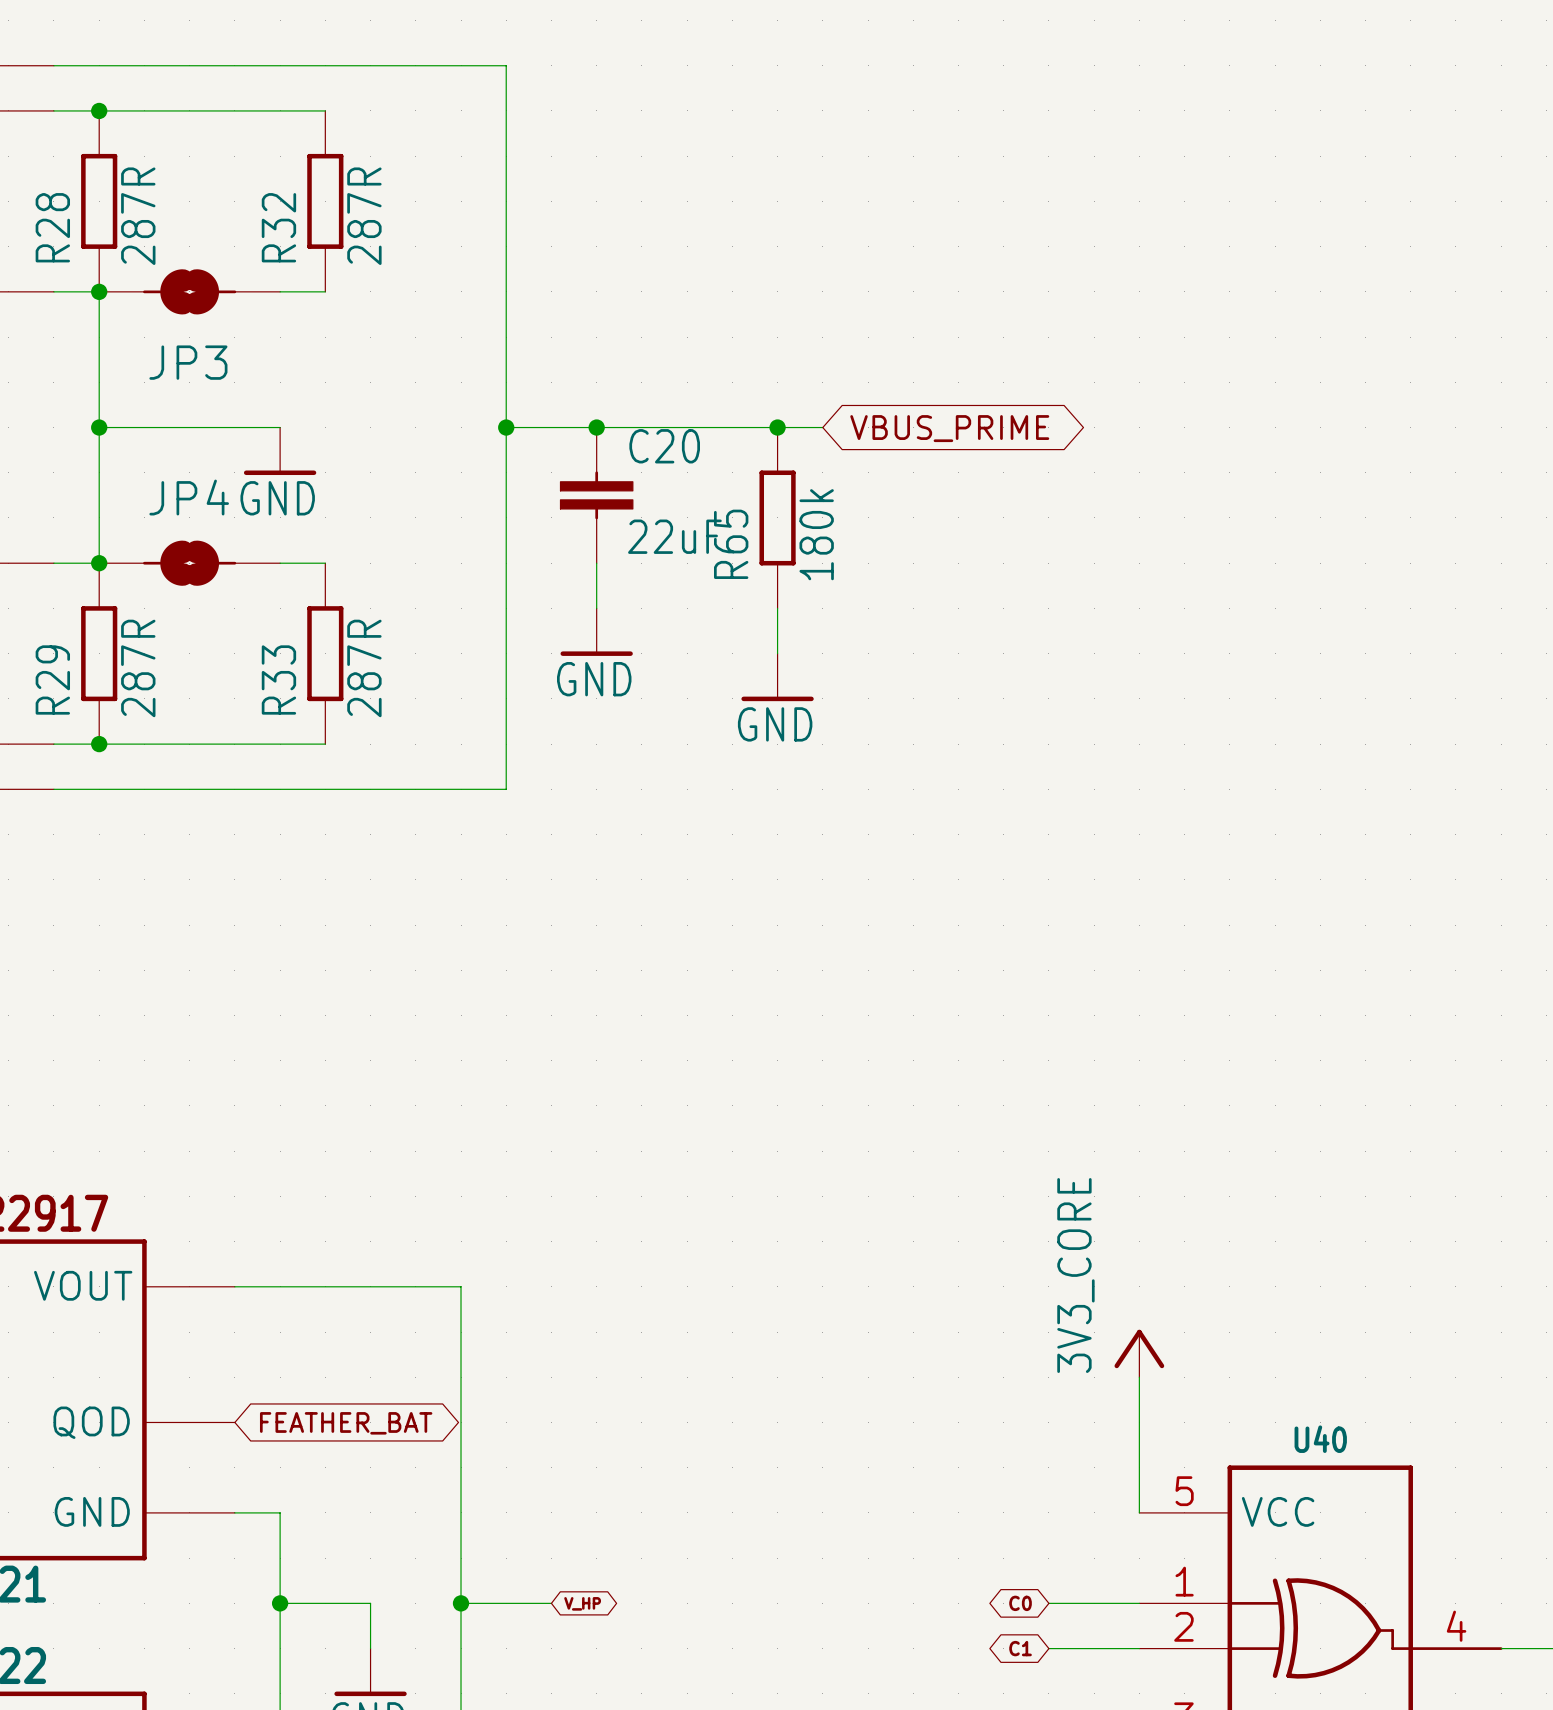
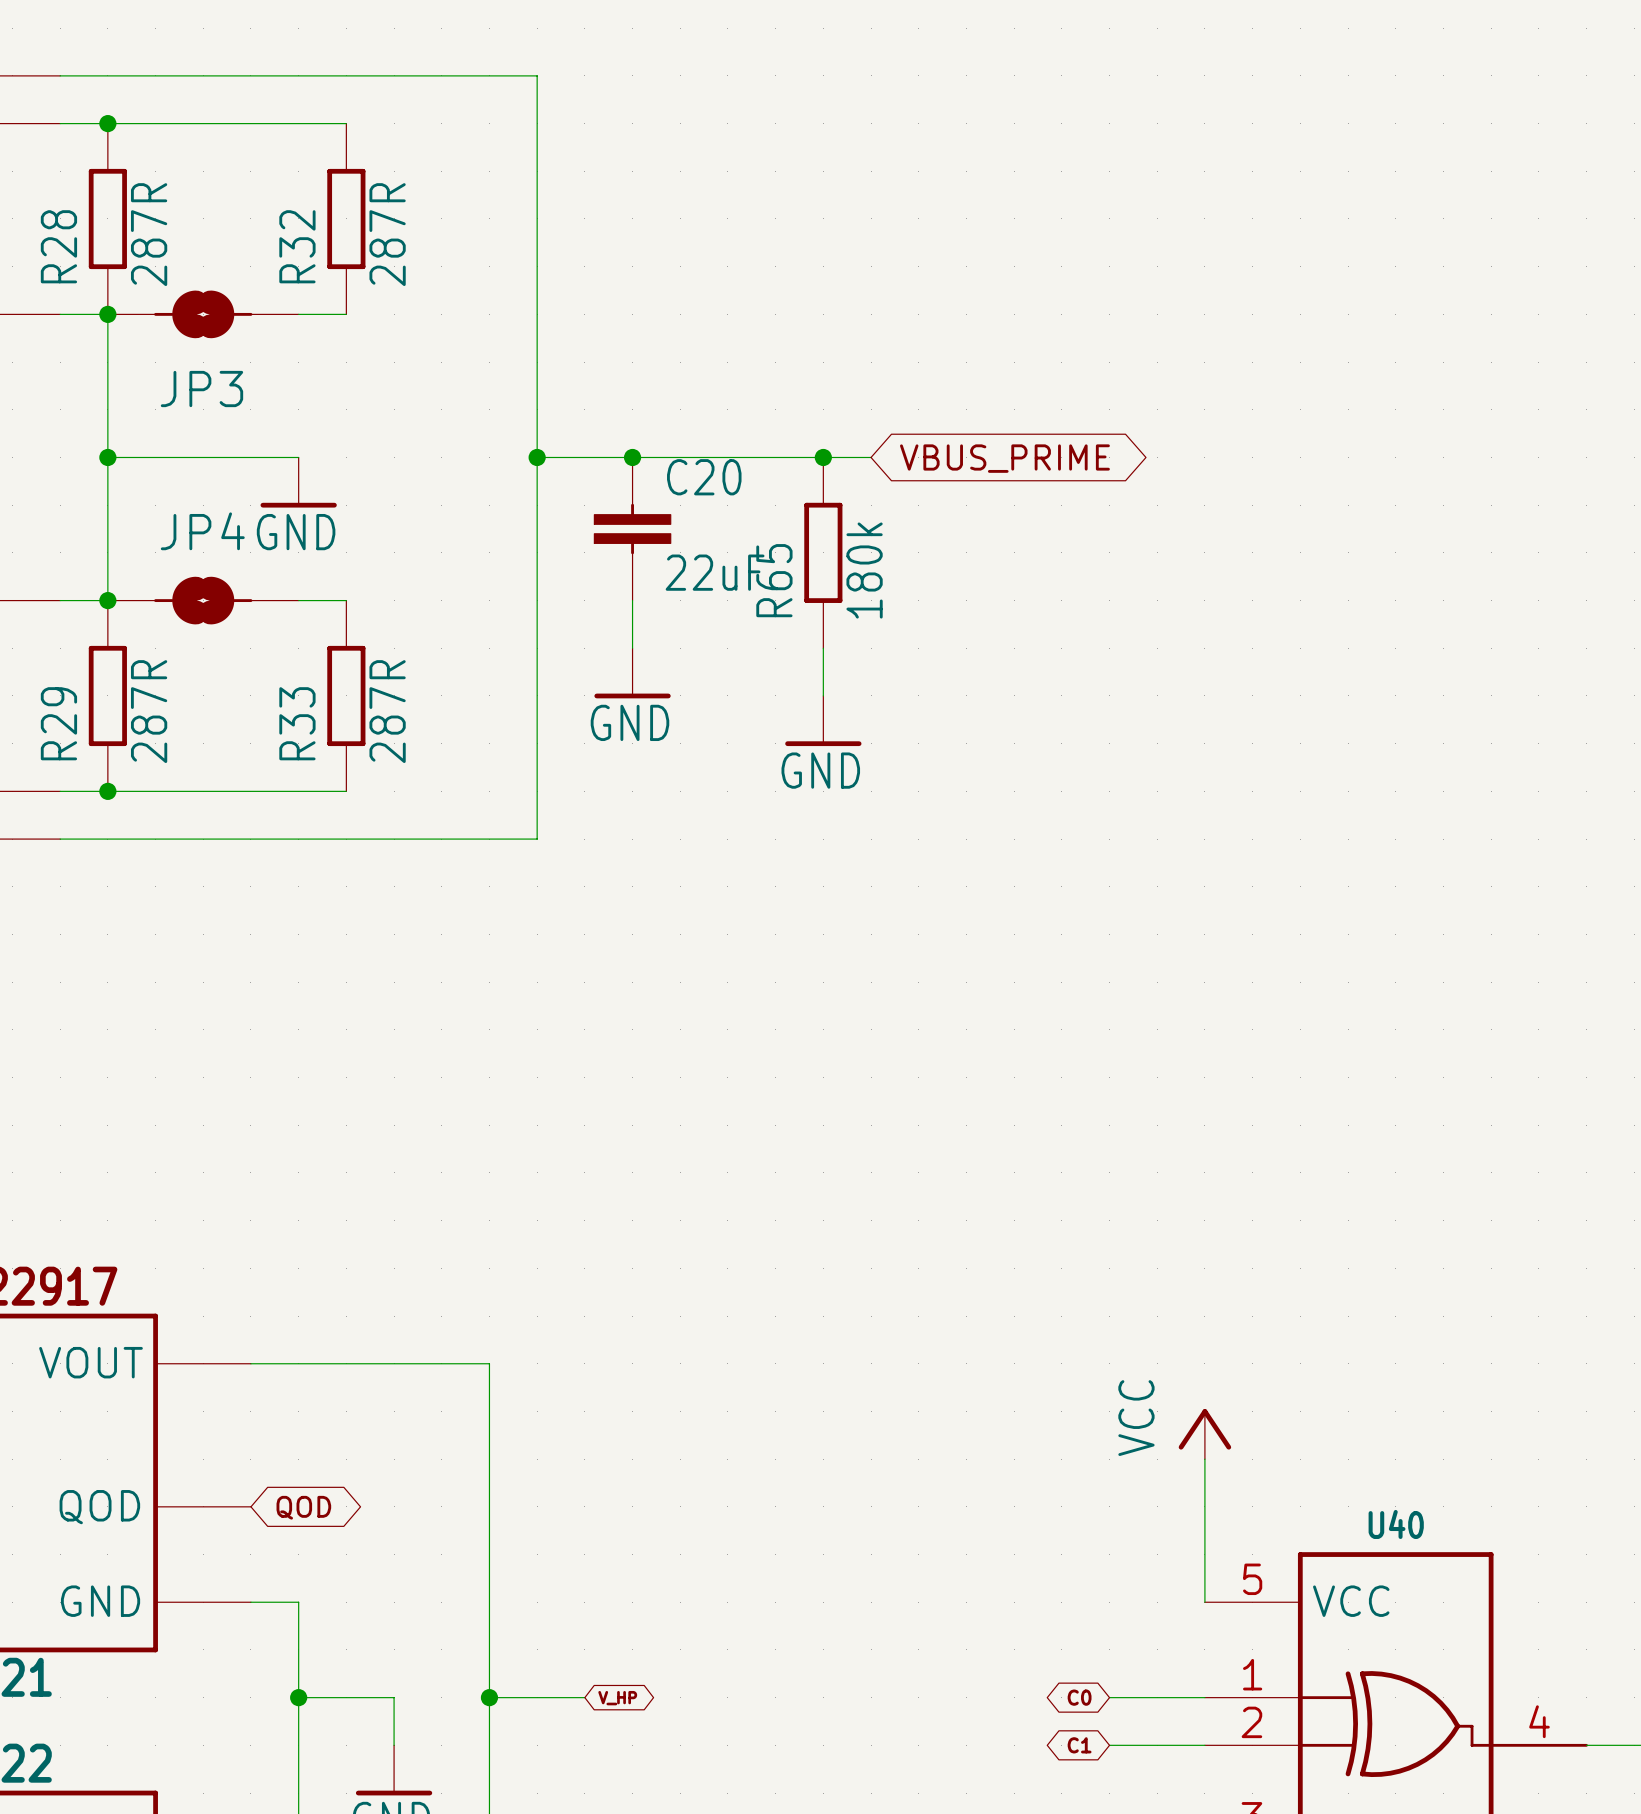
power symbol: 3V3_CORE (1139, 1353) -> VCC (1204, 1434)
global label: FEATHER_BAT (346, 1423) -> QOD (303, 1507)

